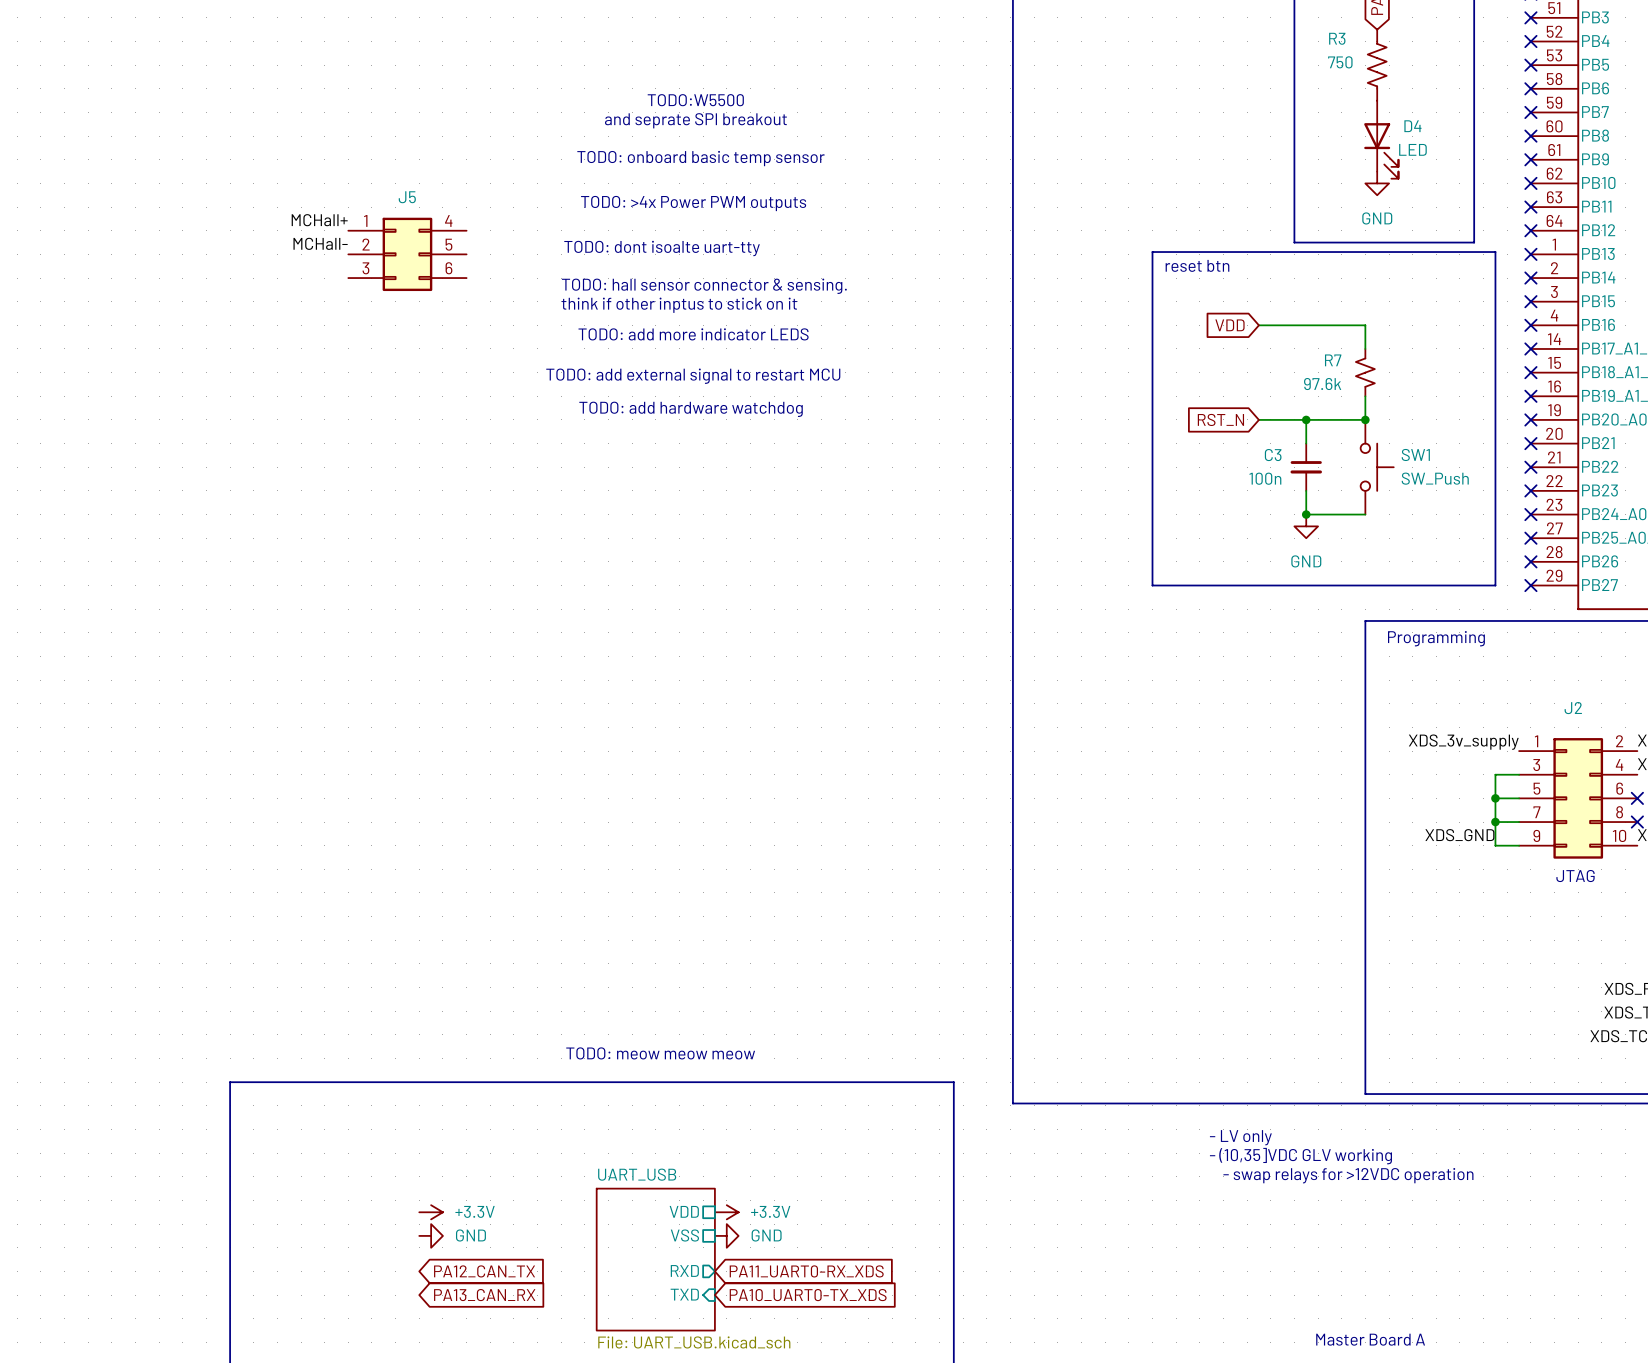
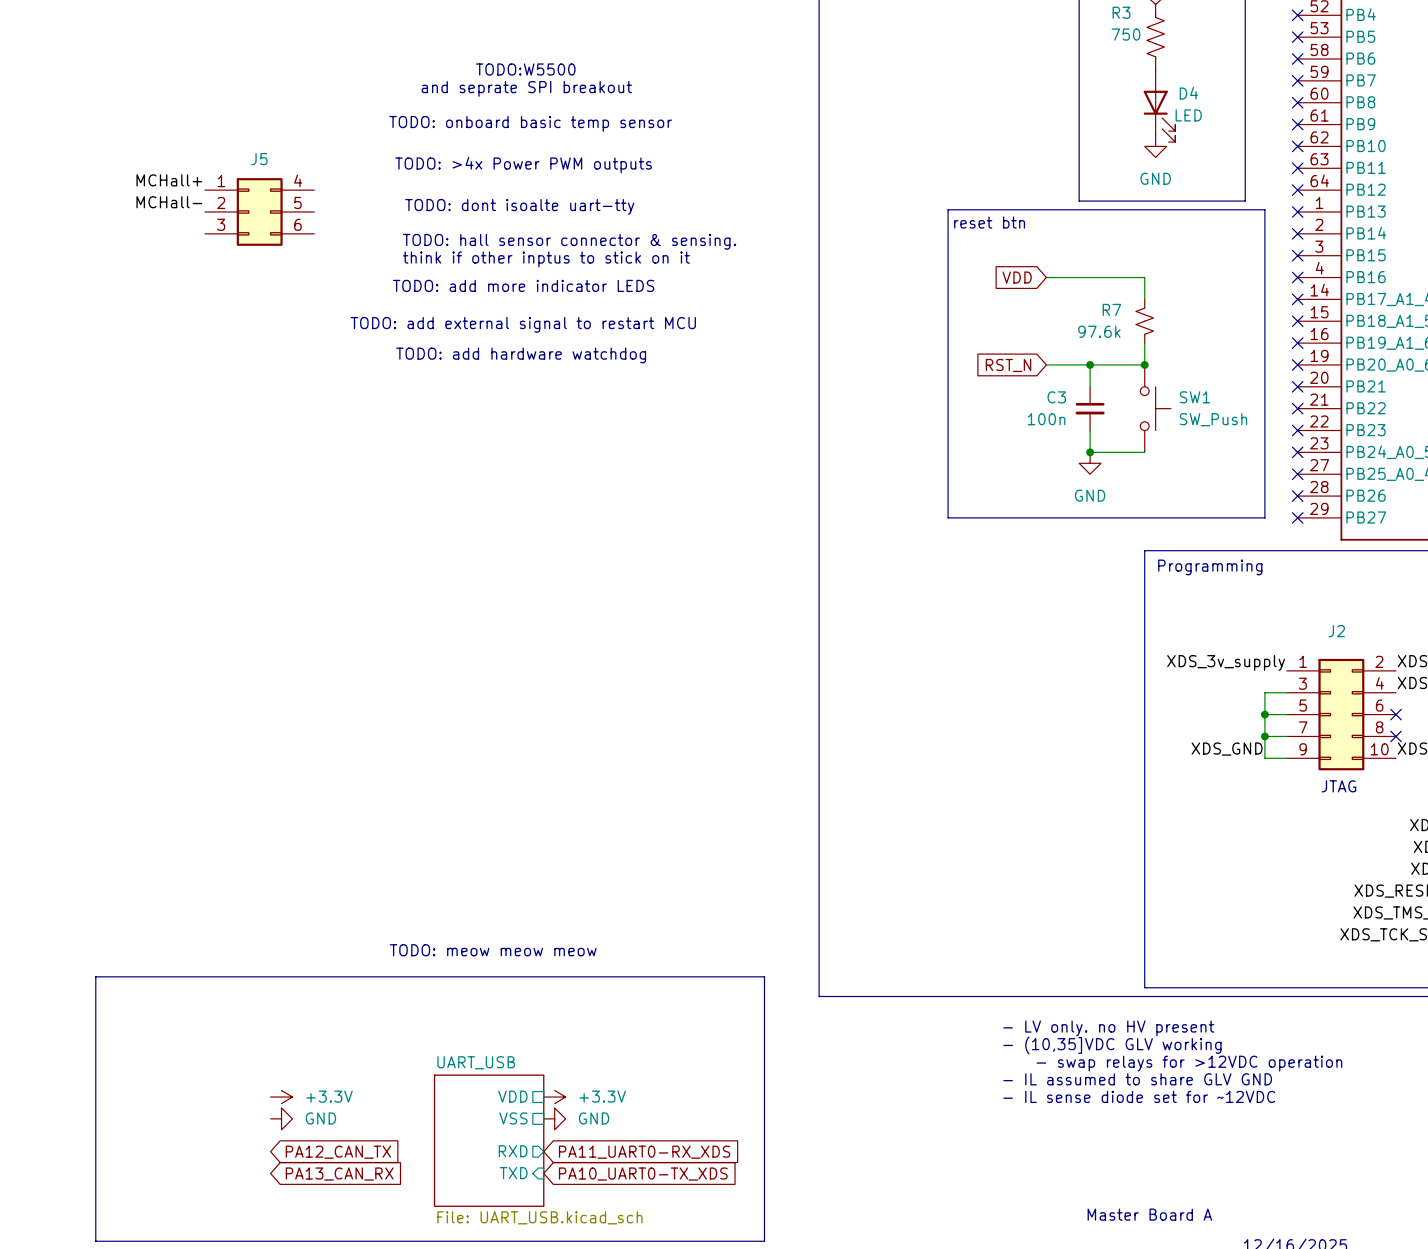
text: - LV only (1240, 1137) -> - LV only. no HV present (1108, 1028)
text: none -> - IL assumed to share GLV GND (1137, 1079)
text: none -> - IL sense diode set for ~12VDC (1139, 1096)

